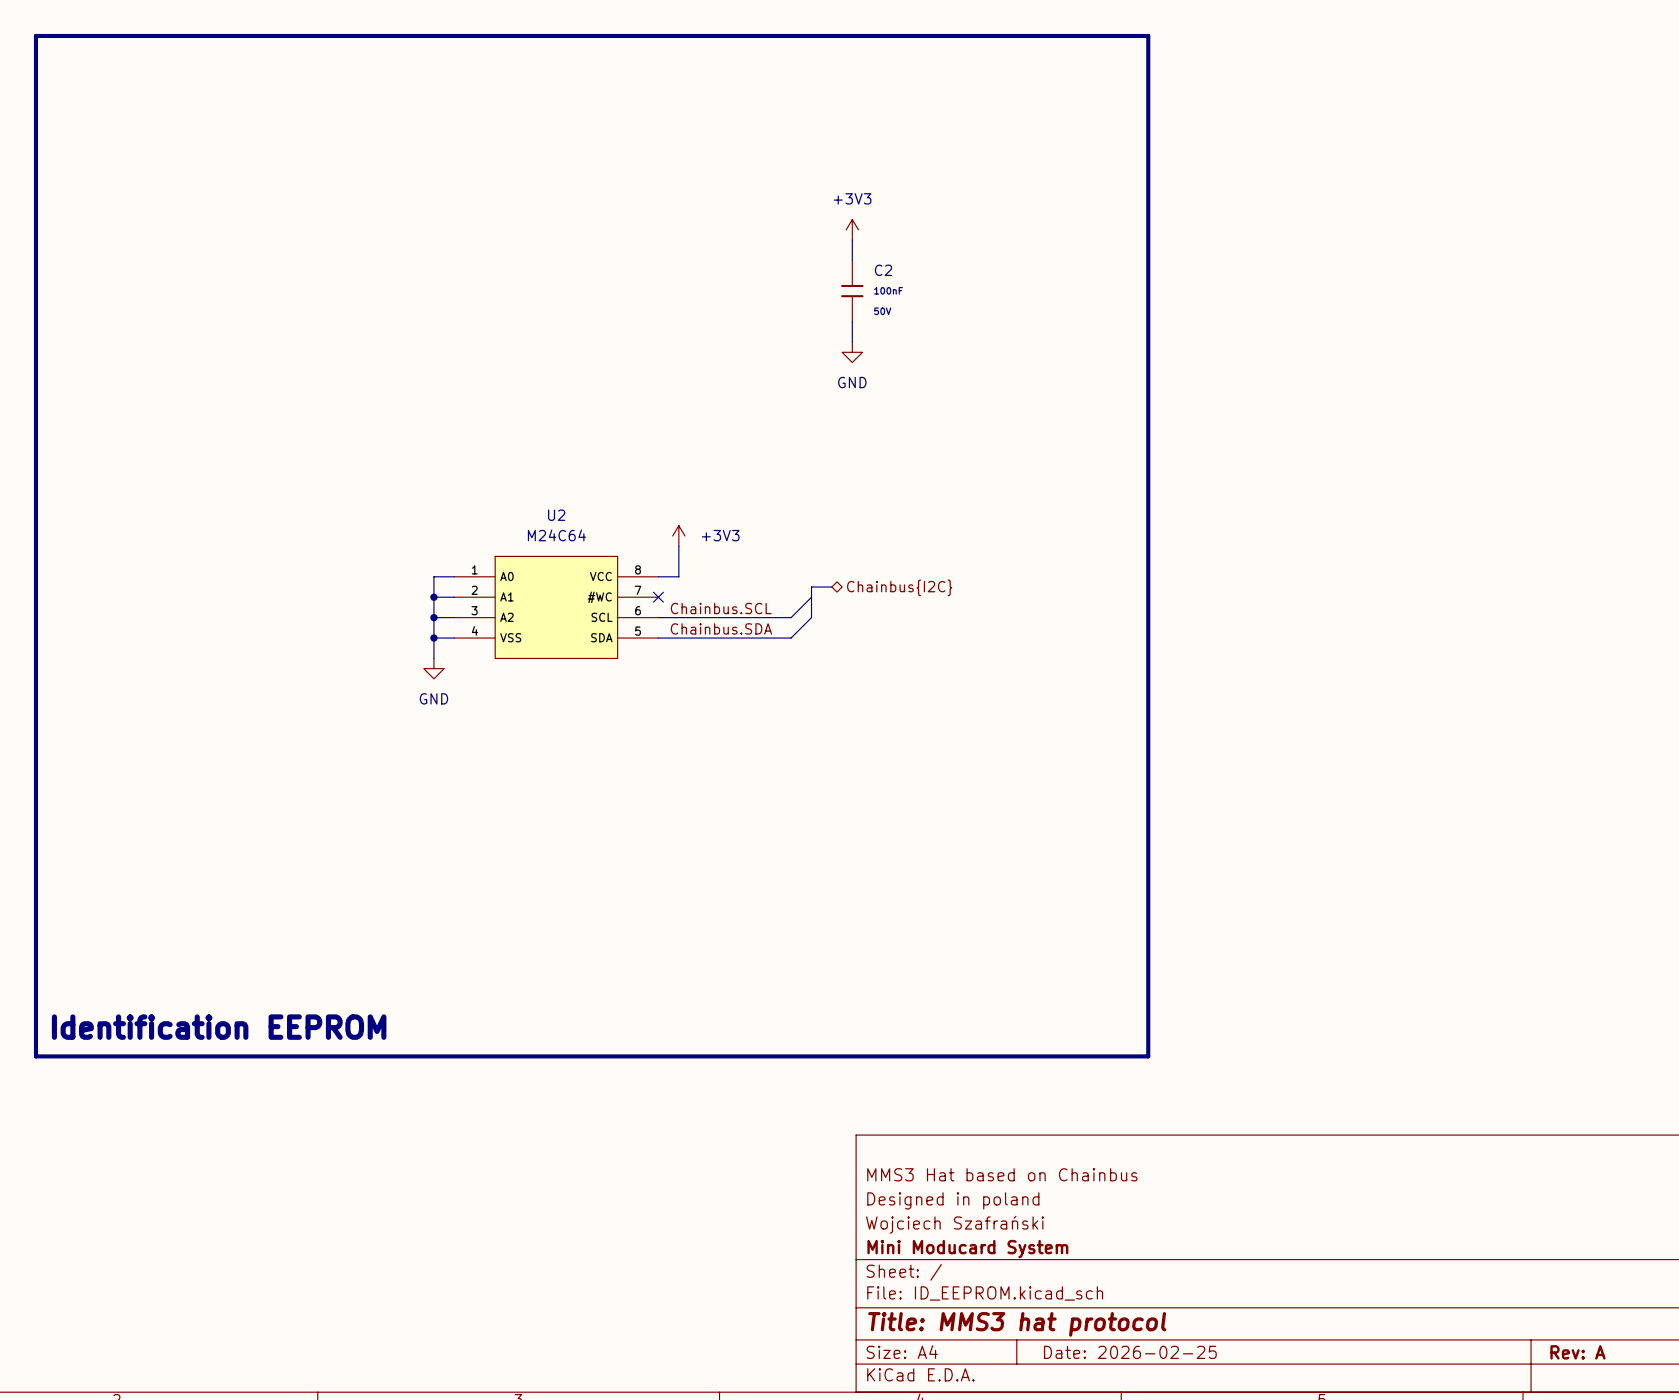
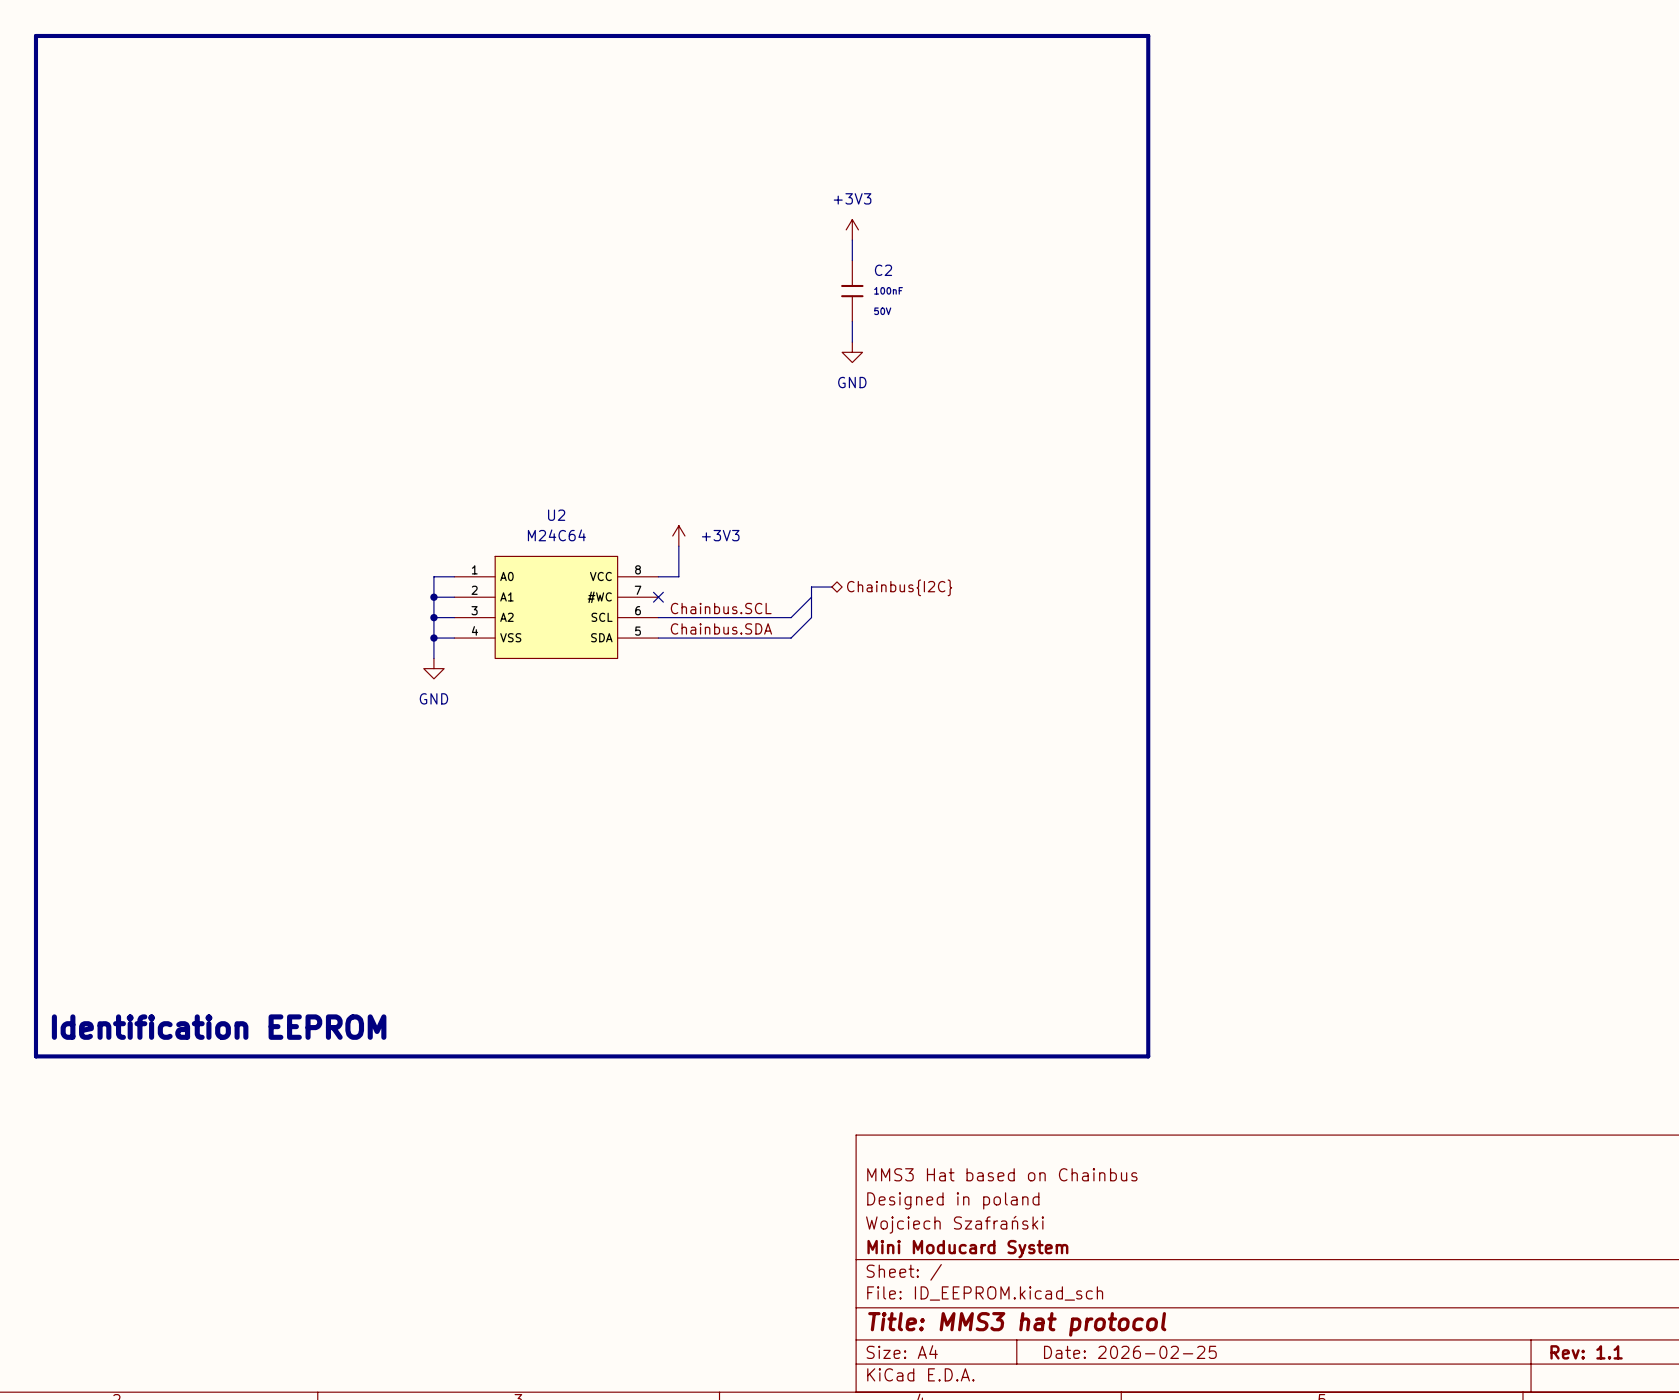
title block: Rev: A (1577, 1352) -> Rev: 1.1 (1586, 1352)

